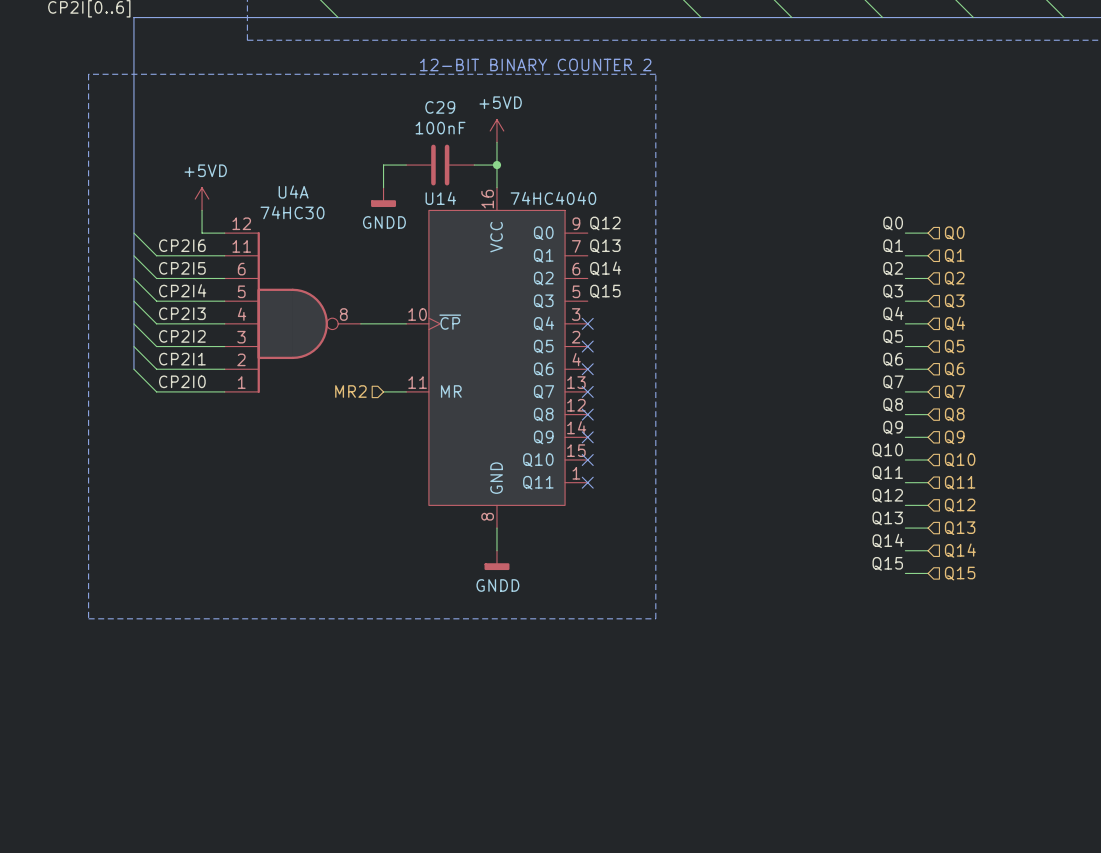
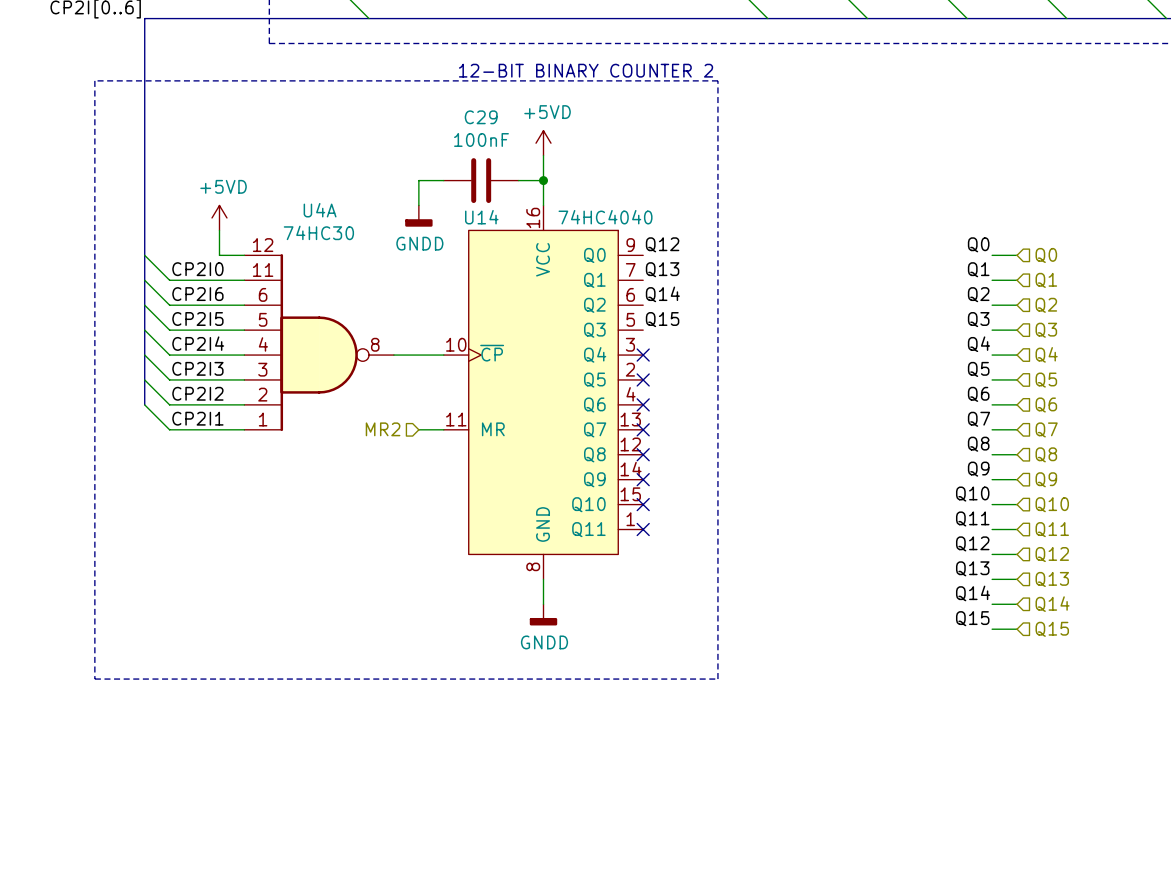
label: CP2I6 (182, 245) -> CP2I0 (197, 269)
label: CP2I5 (182, 268) -> CP2I6 (197, 294)
label: CP2I4 (182, 290) -> CP2I5 (197, 319)
label: CP2I3 (182, 313) -> CP2I4 (198, 343)
label: CP2I2 (182, 336) -> CP2I3 (197, 368)
label: CP2I1 (182, 359) -> CP2I2 (197, 393)
label: CP2I0 (182, 381) -> CP2I1 (197, 418)

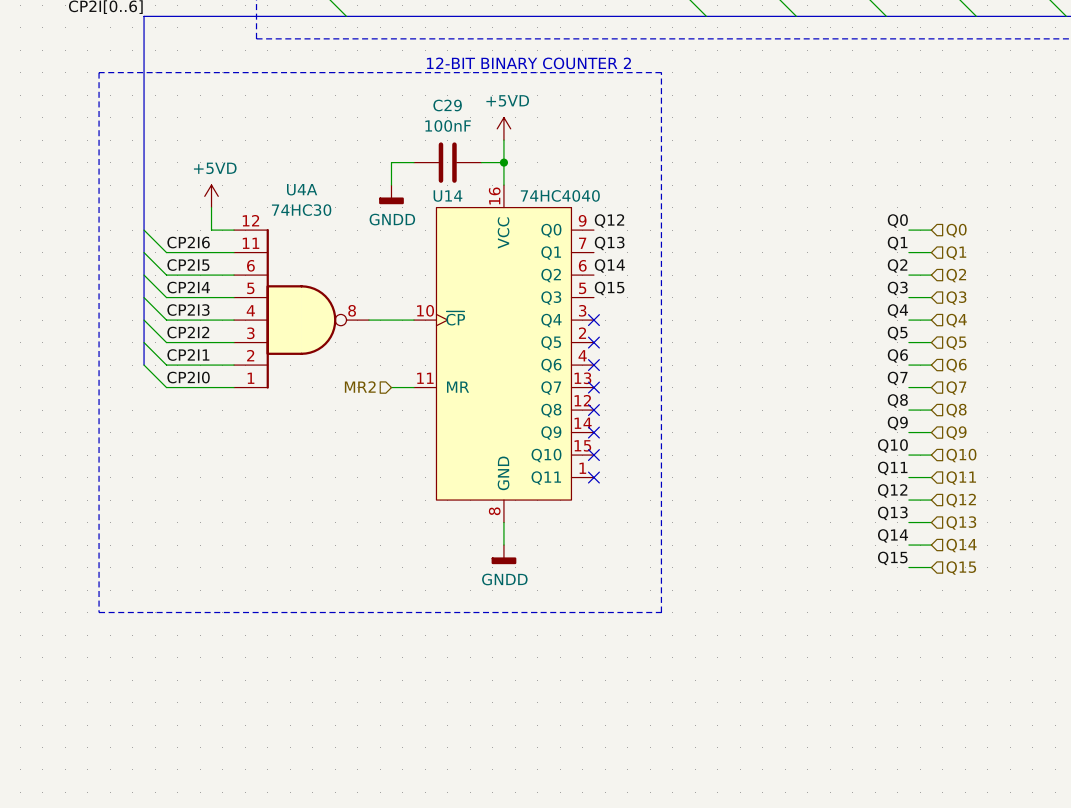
label: CP2I0 (197, 269) -> CP2I6 (188, 242)
label: CP2I6 (197, 294) -> CP2I5 (188, 265)
label: CP2I5 (197, 319) -> CP2I4 (188, 287)
label: CP2I4 (198, 343) -> CP2I3 (188, 310)
label: CP2I3 (197, 368) -> CP2I2 (188, 332)
label: CP2I2 (197, 393) -> CP2I1 (188, 355)
label: CP2I1 (197, 418) -> CP2I0 (188, 377)

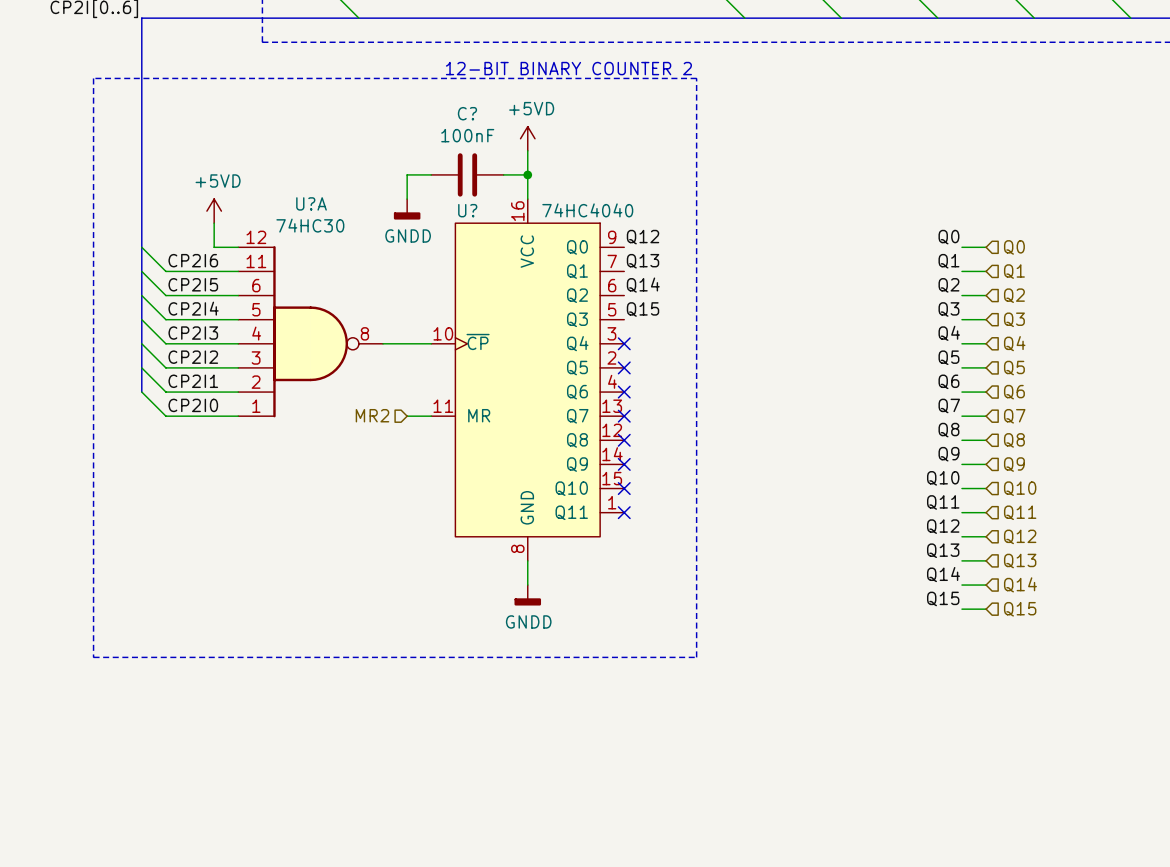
C29 name: C29 (447, 105) -> C? (467, 113)
U4A name: U4A (302, 189) -> U?A (311, 203)
U14 name: U14 (447, 196) -> U? (467, 210)

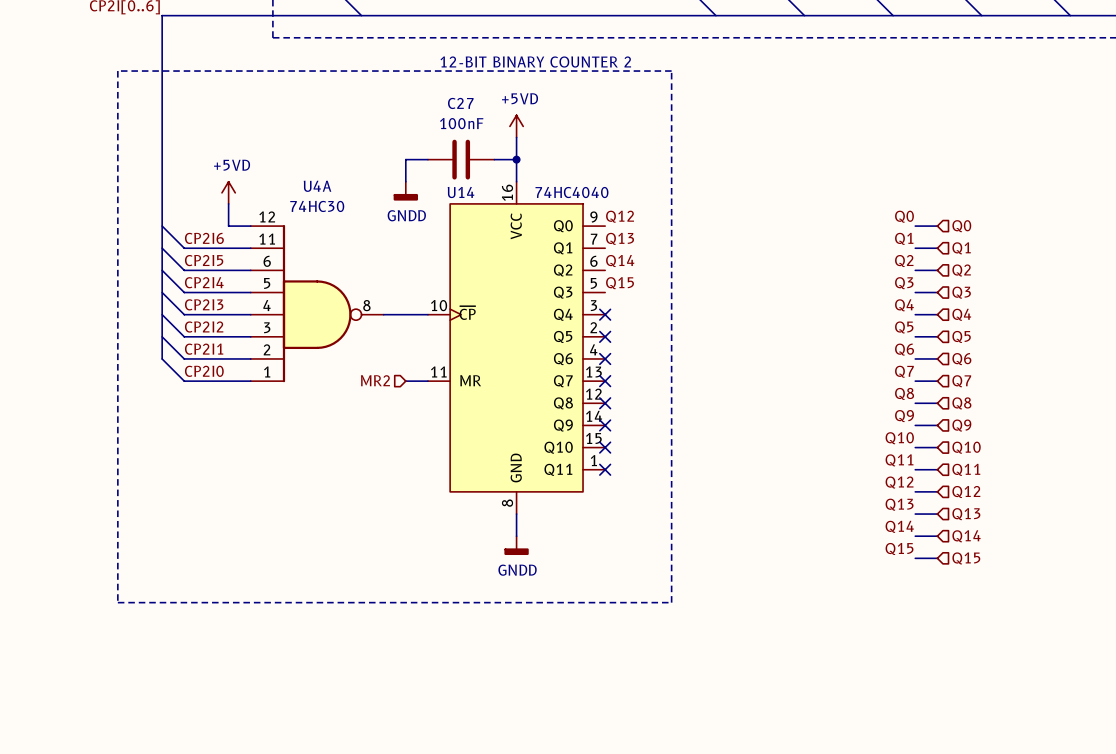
C? name: C? (467, 113) -> C27 (460, 103)
U?A name: U?A (311, 203) -> U4A (317, 186)
U? name: U? (467, 210) -> U14 (461, 192)

